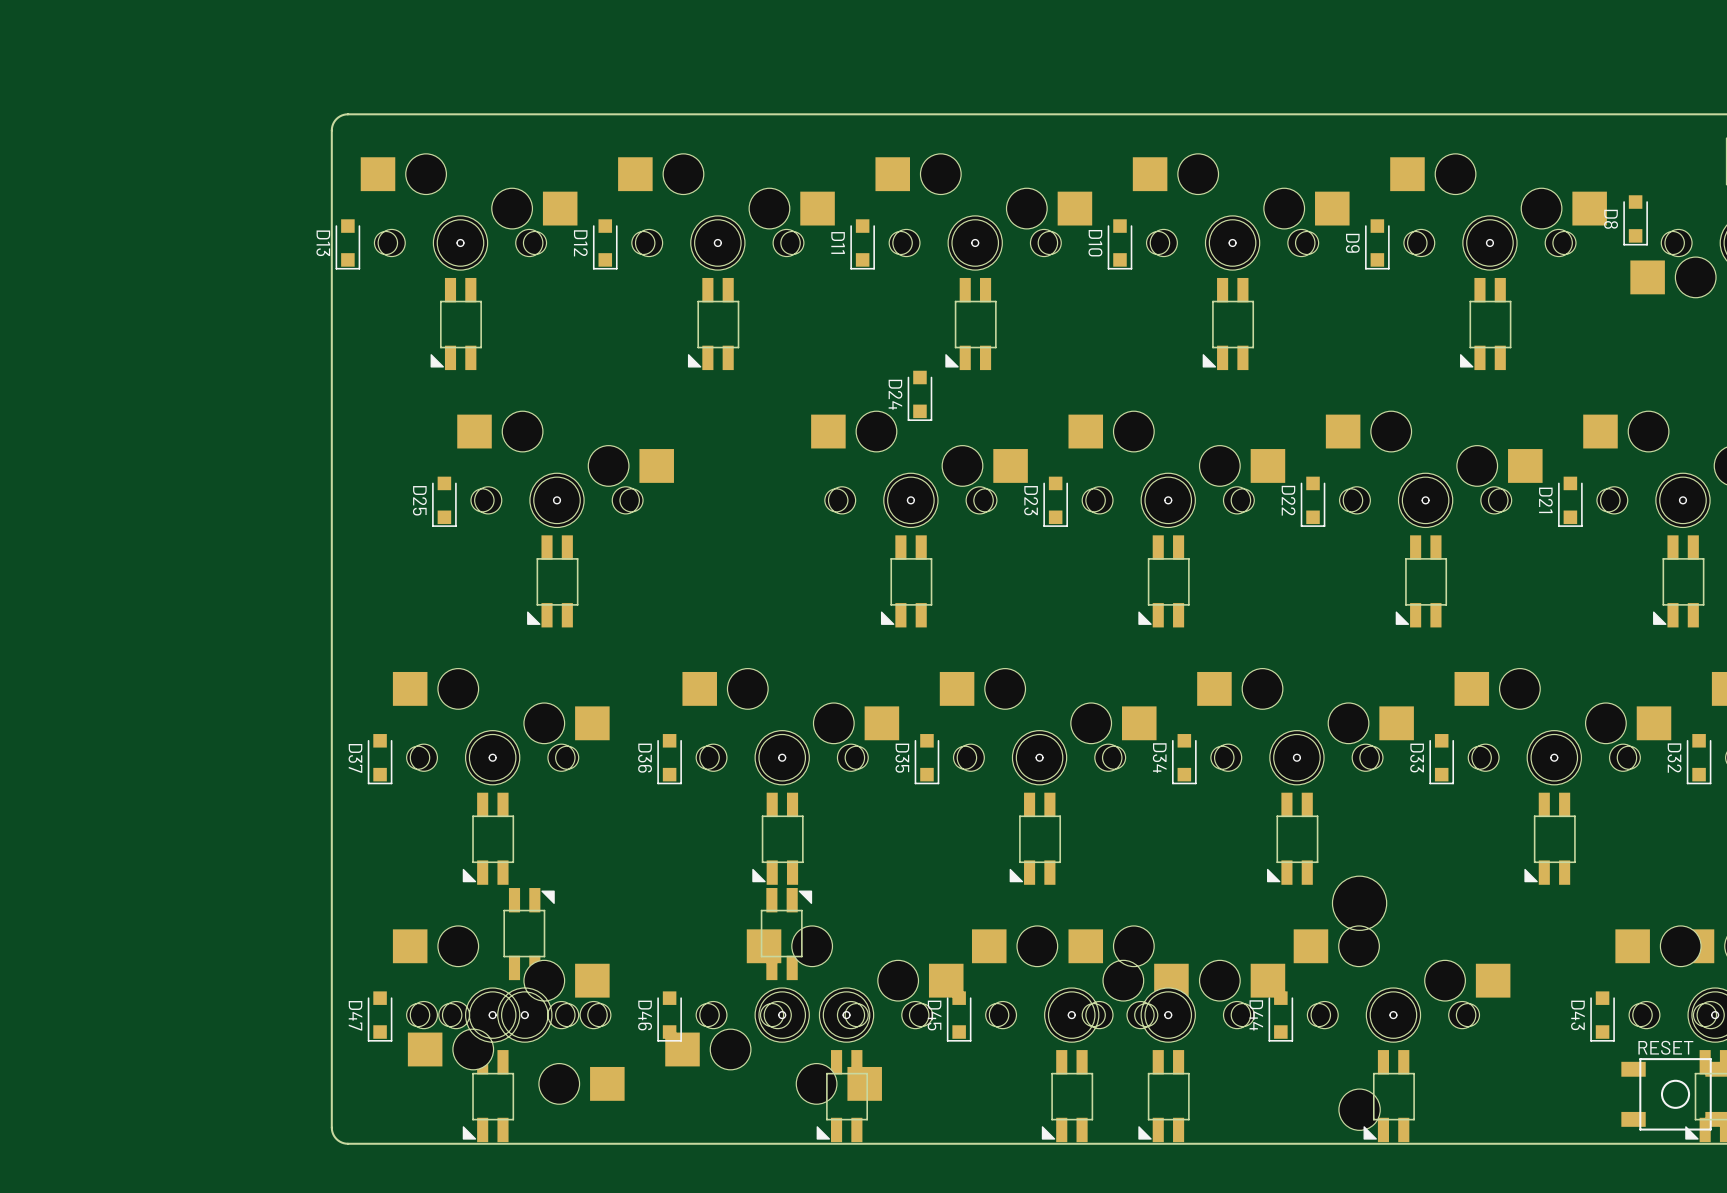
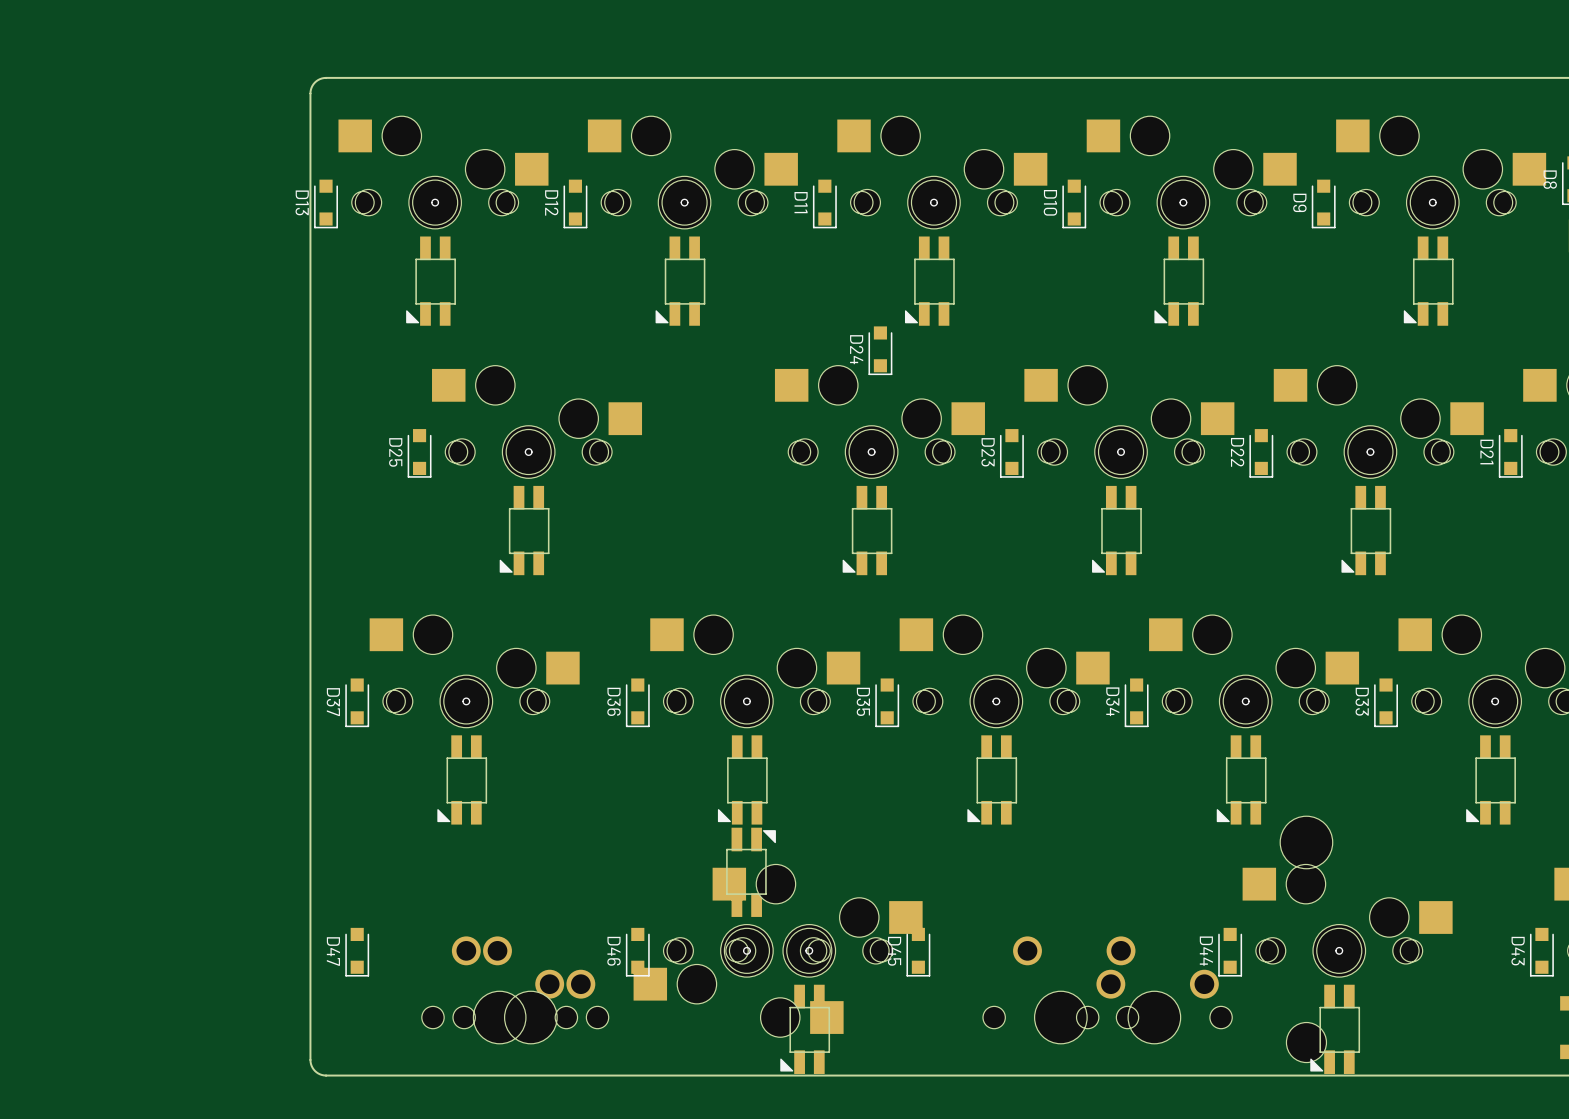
part: (516, 996) -> none
part: (501, 1034) -> none
part: (1080, 1034) -> none
part: (1176, 1034) -> none
part: none -> (499, 990)
part: none -> (530, 990)
part: none -> (1060, 990)
part: none -> (1154, 990)

